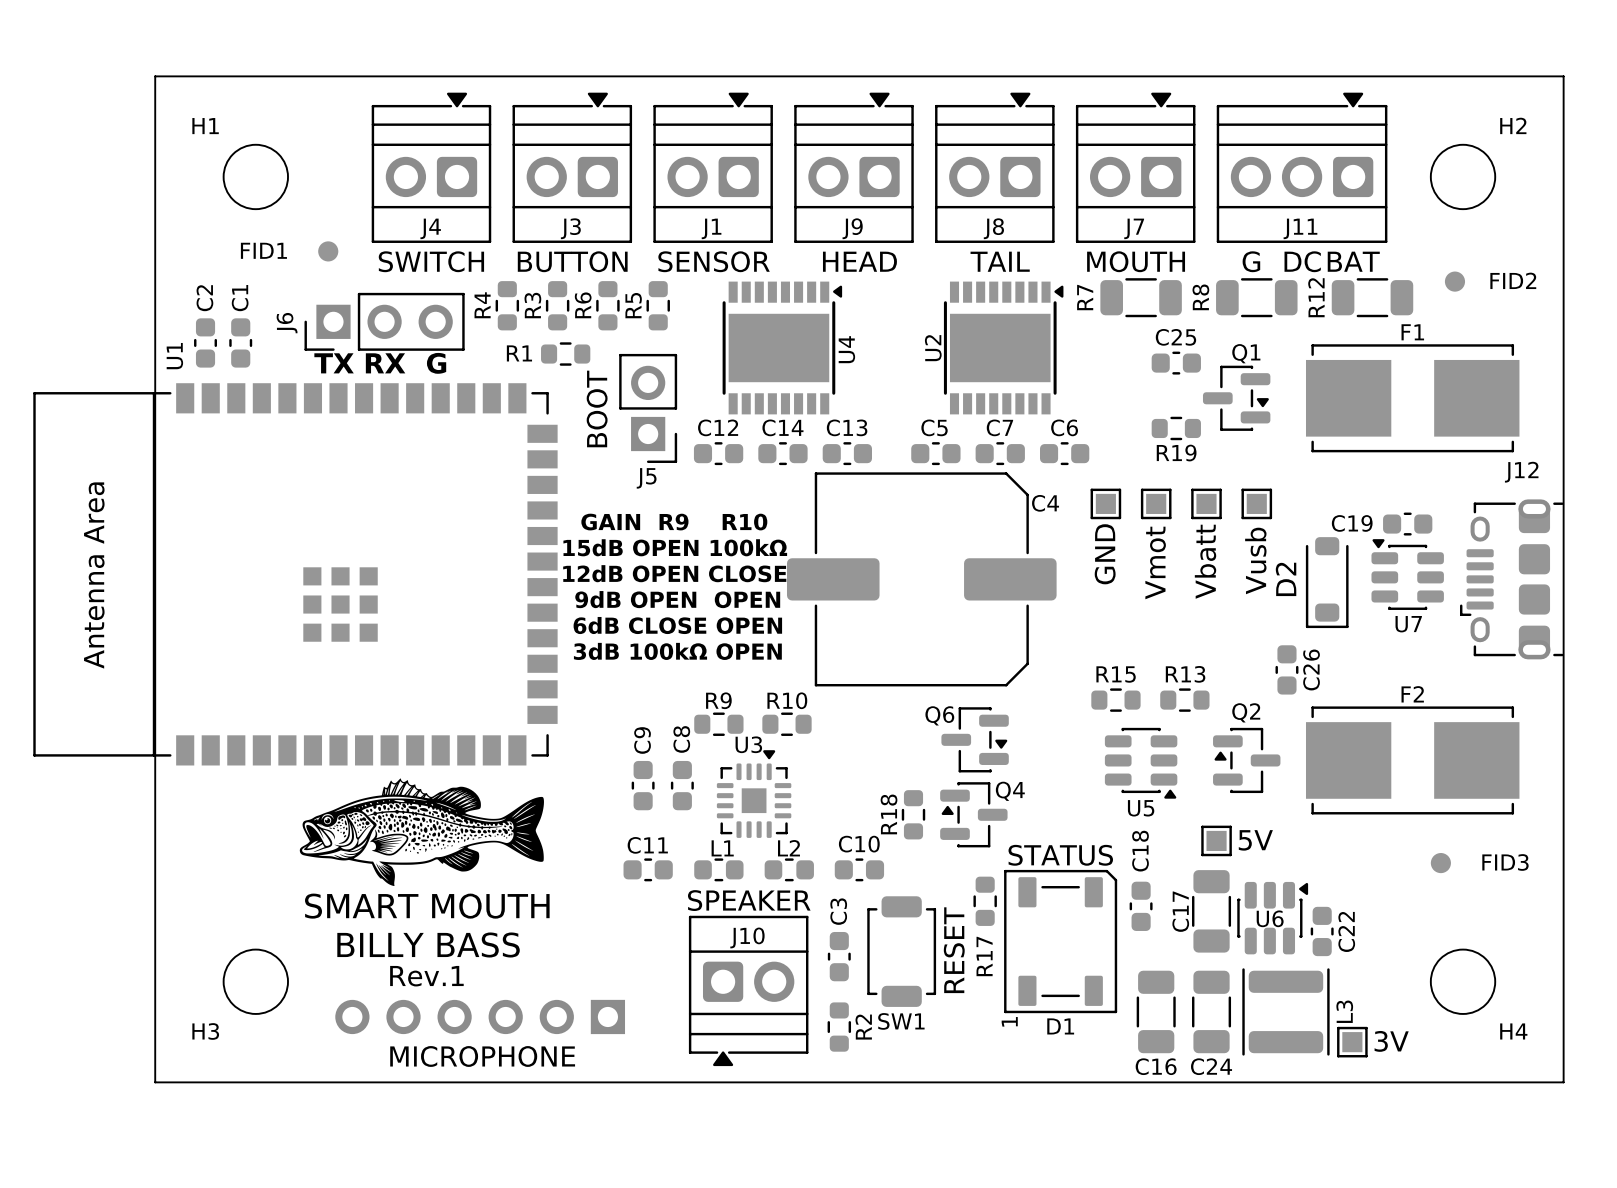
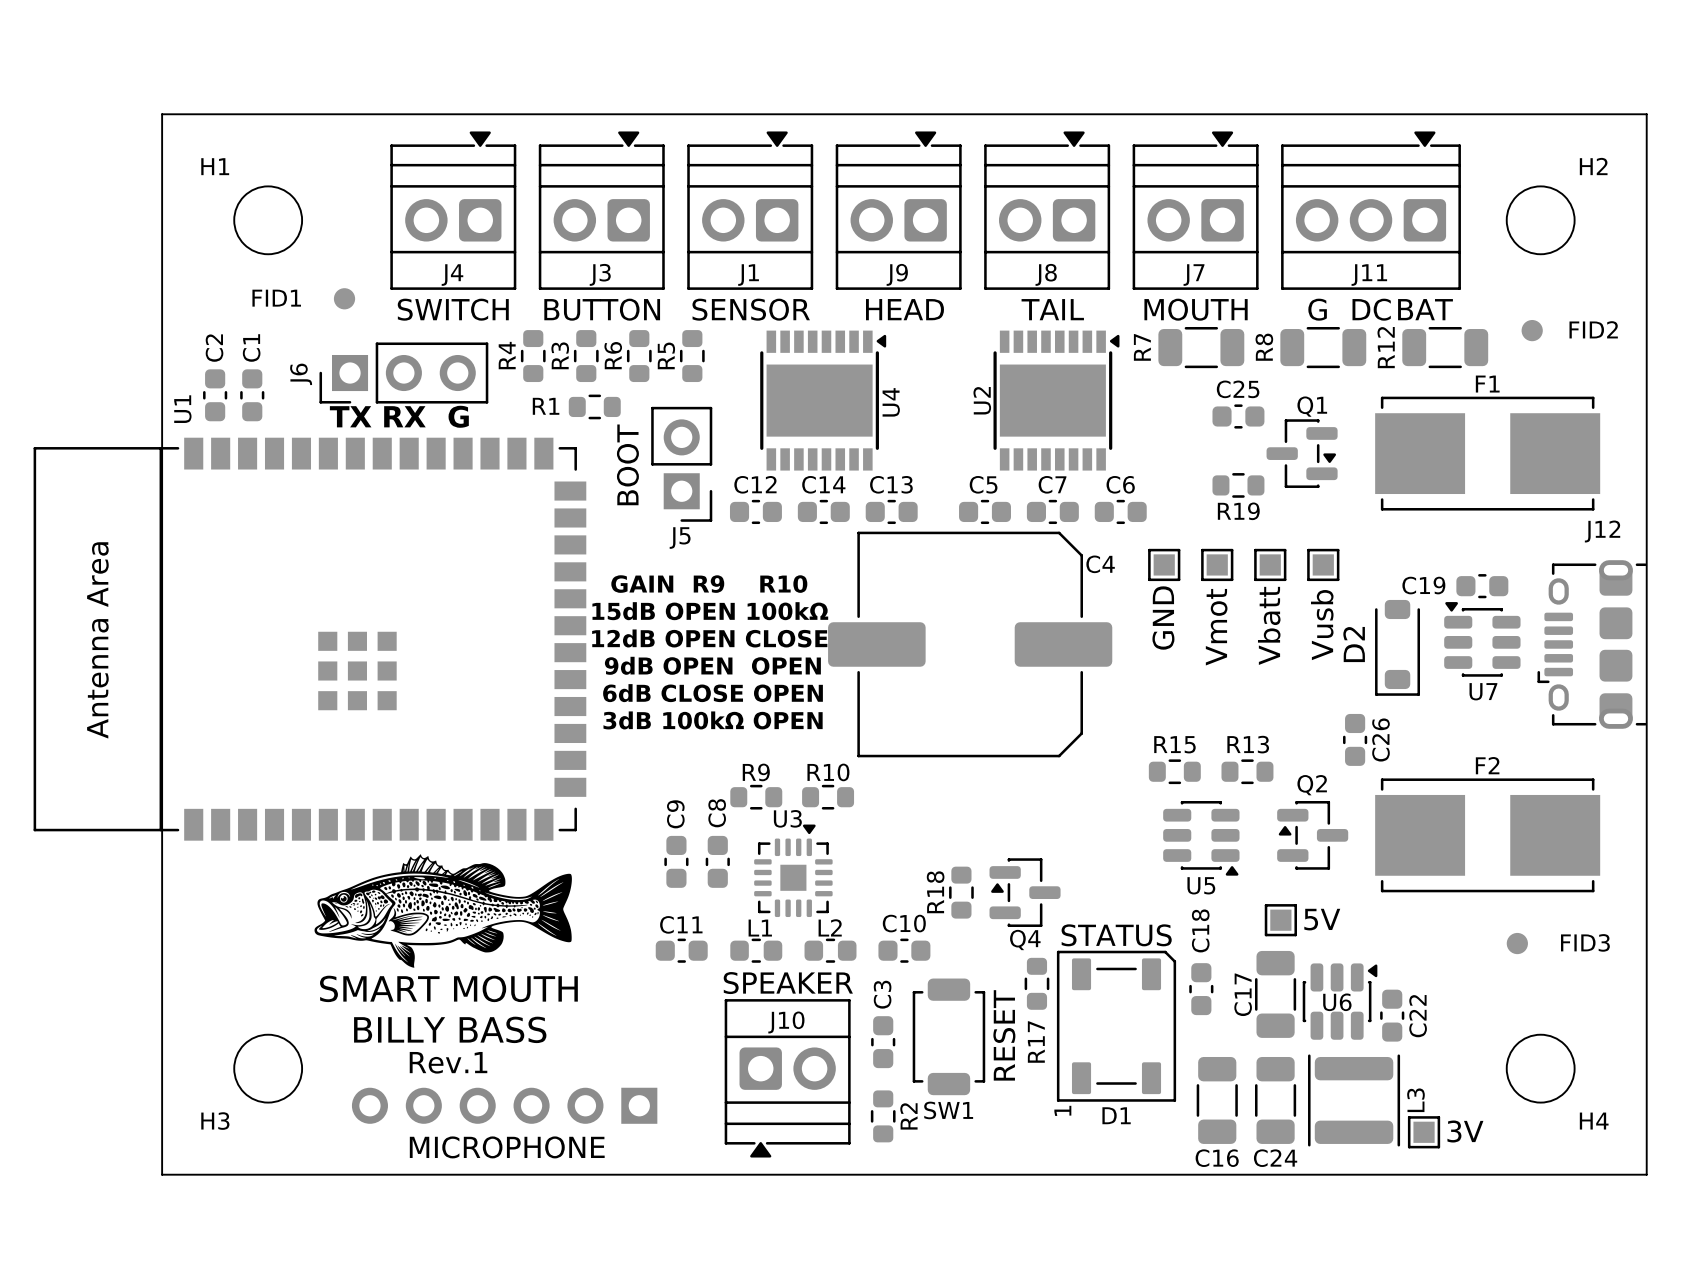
Q6: (975, 739) -> none
Q4 name position: Q4 (1010, 791) -> Q4 (1025, 940)

